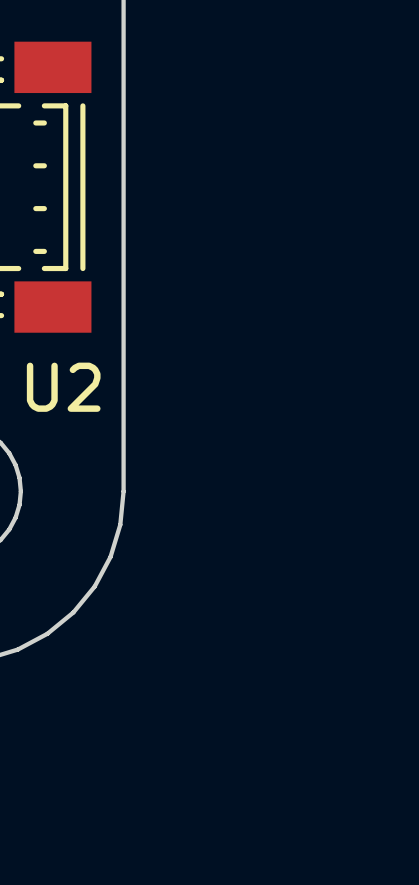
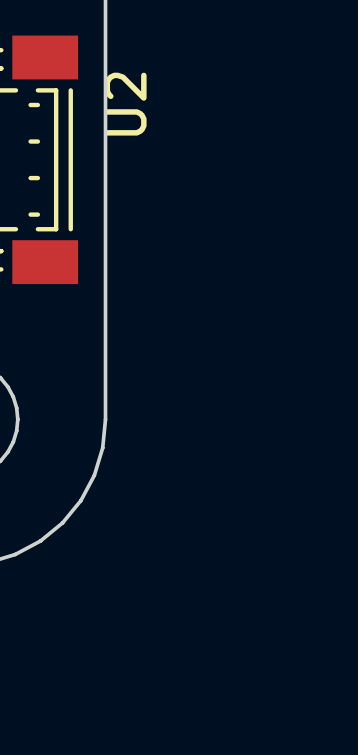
U2 name rotation: 0° (63, 387) -> 90° counterclockwise (125, 104)
U2 name position: U2 (63, 387) -> U2 (125, 104)

